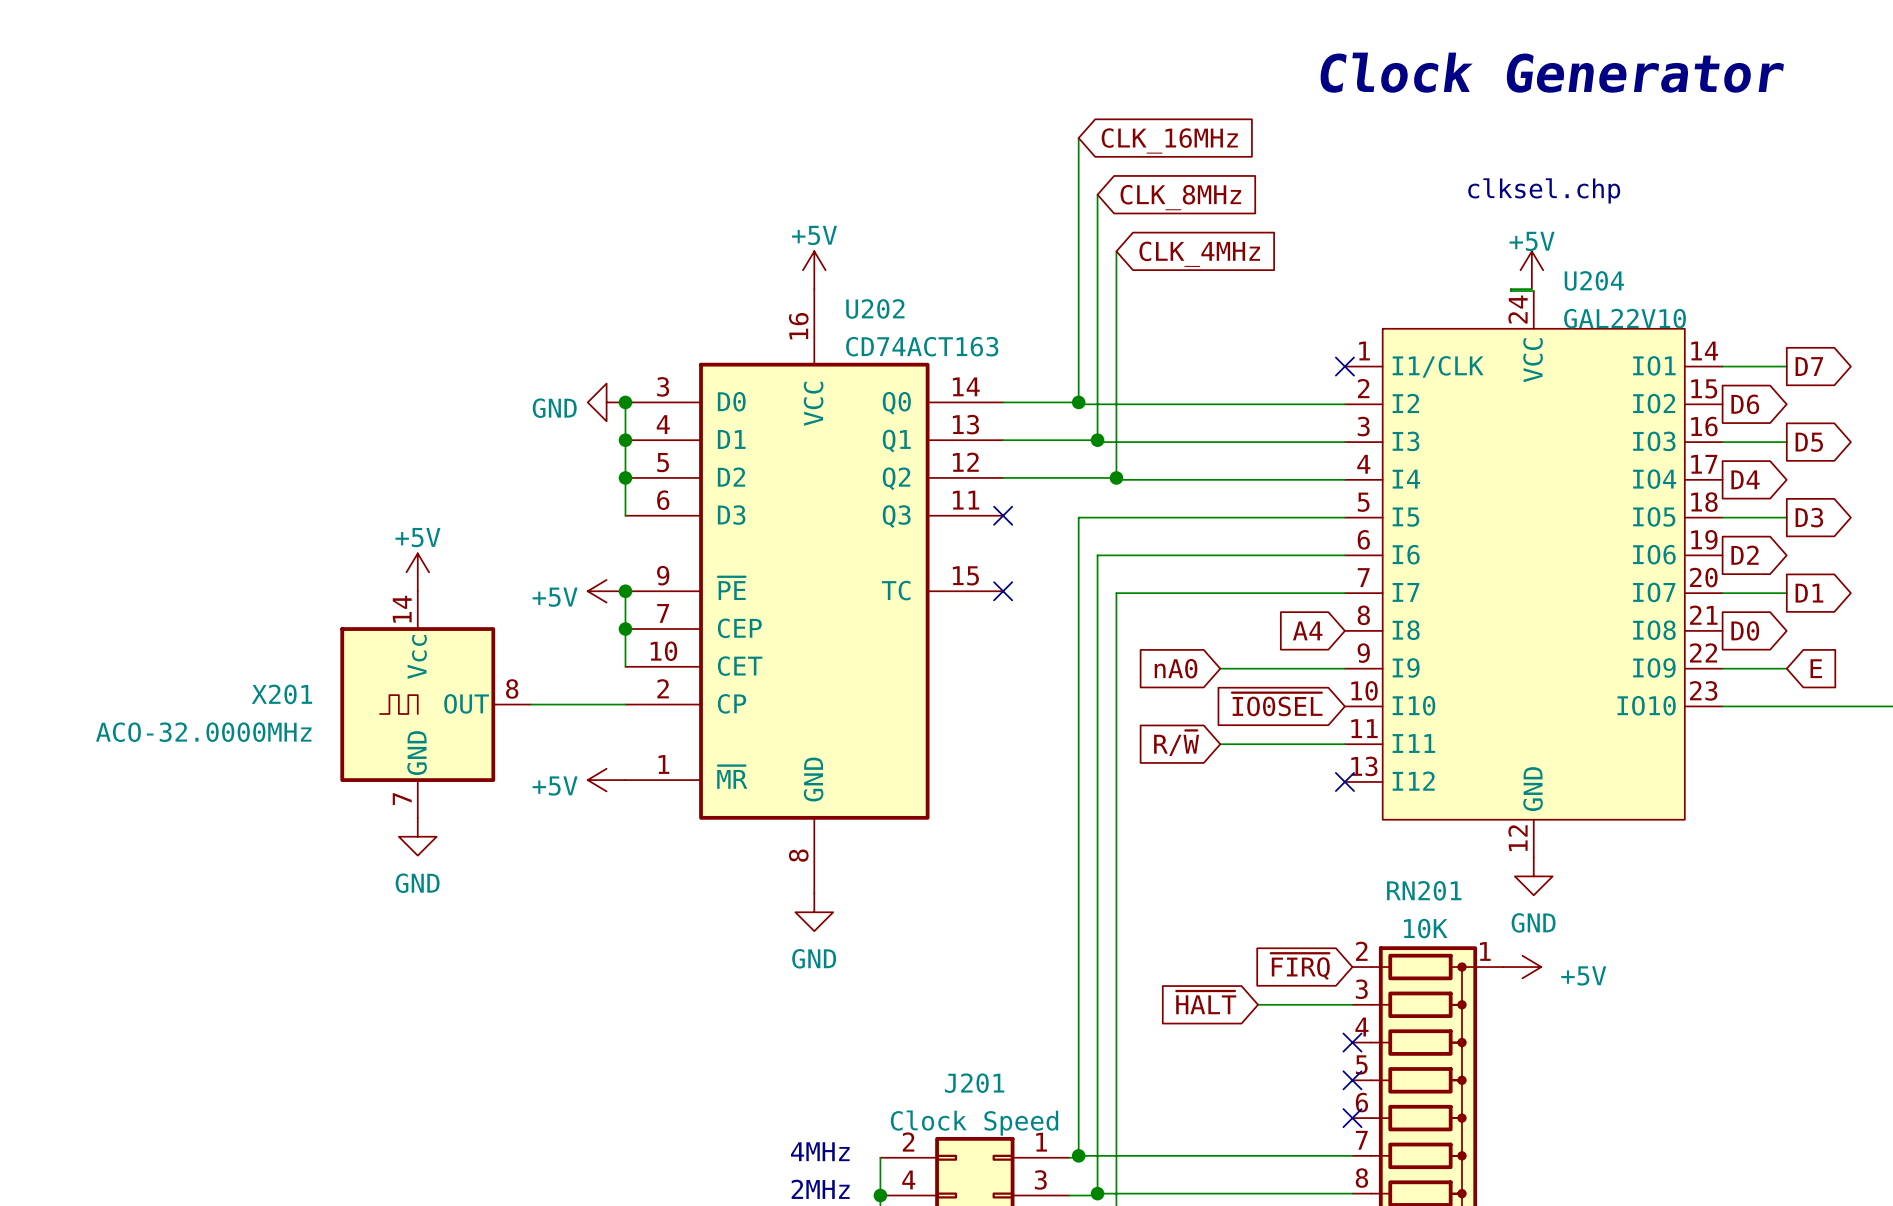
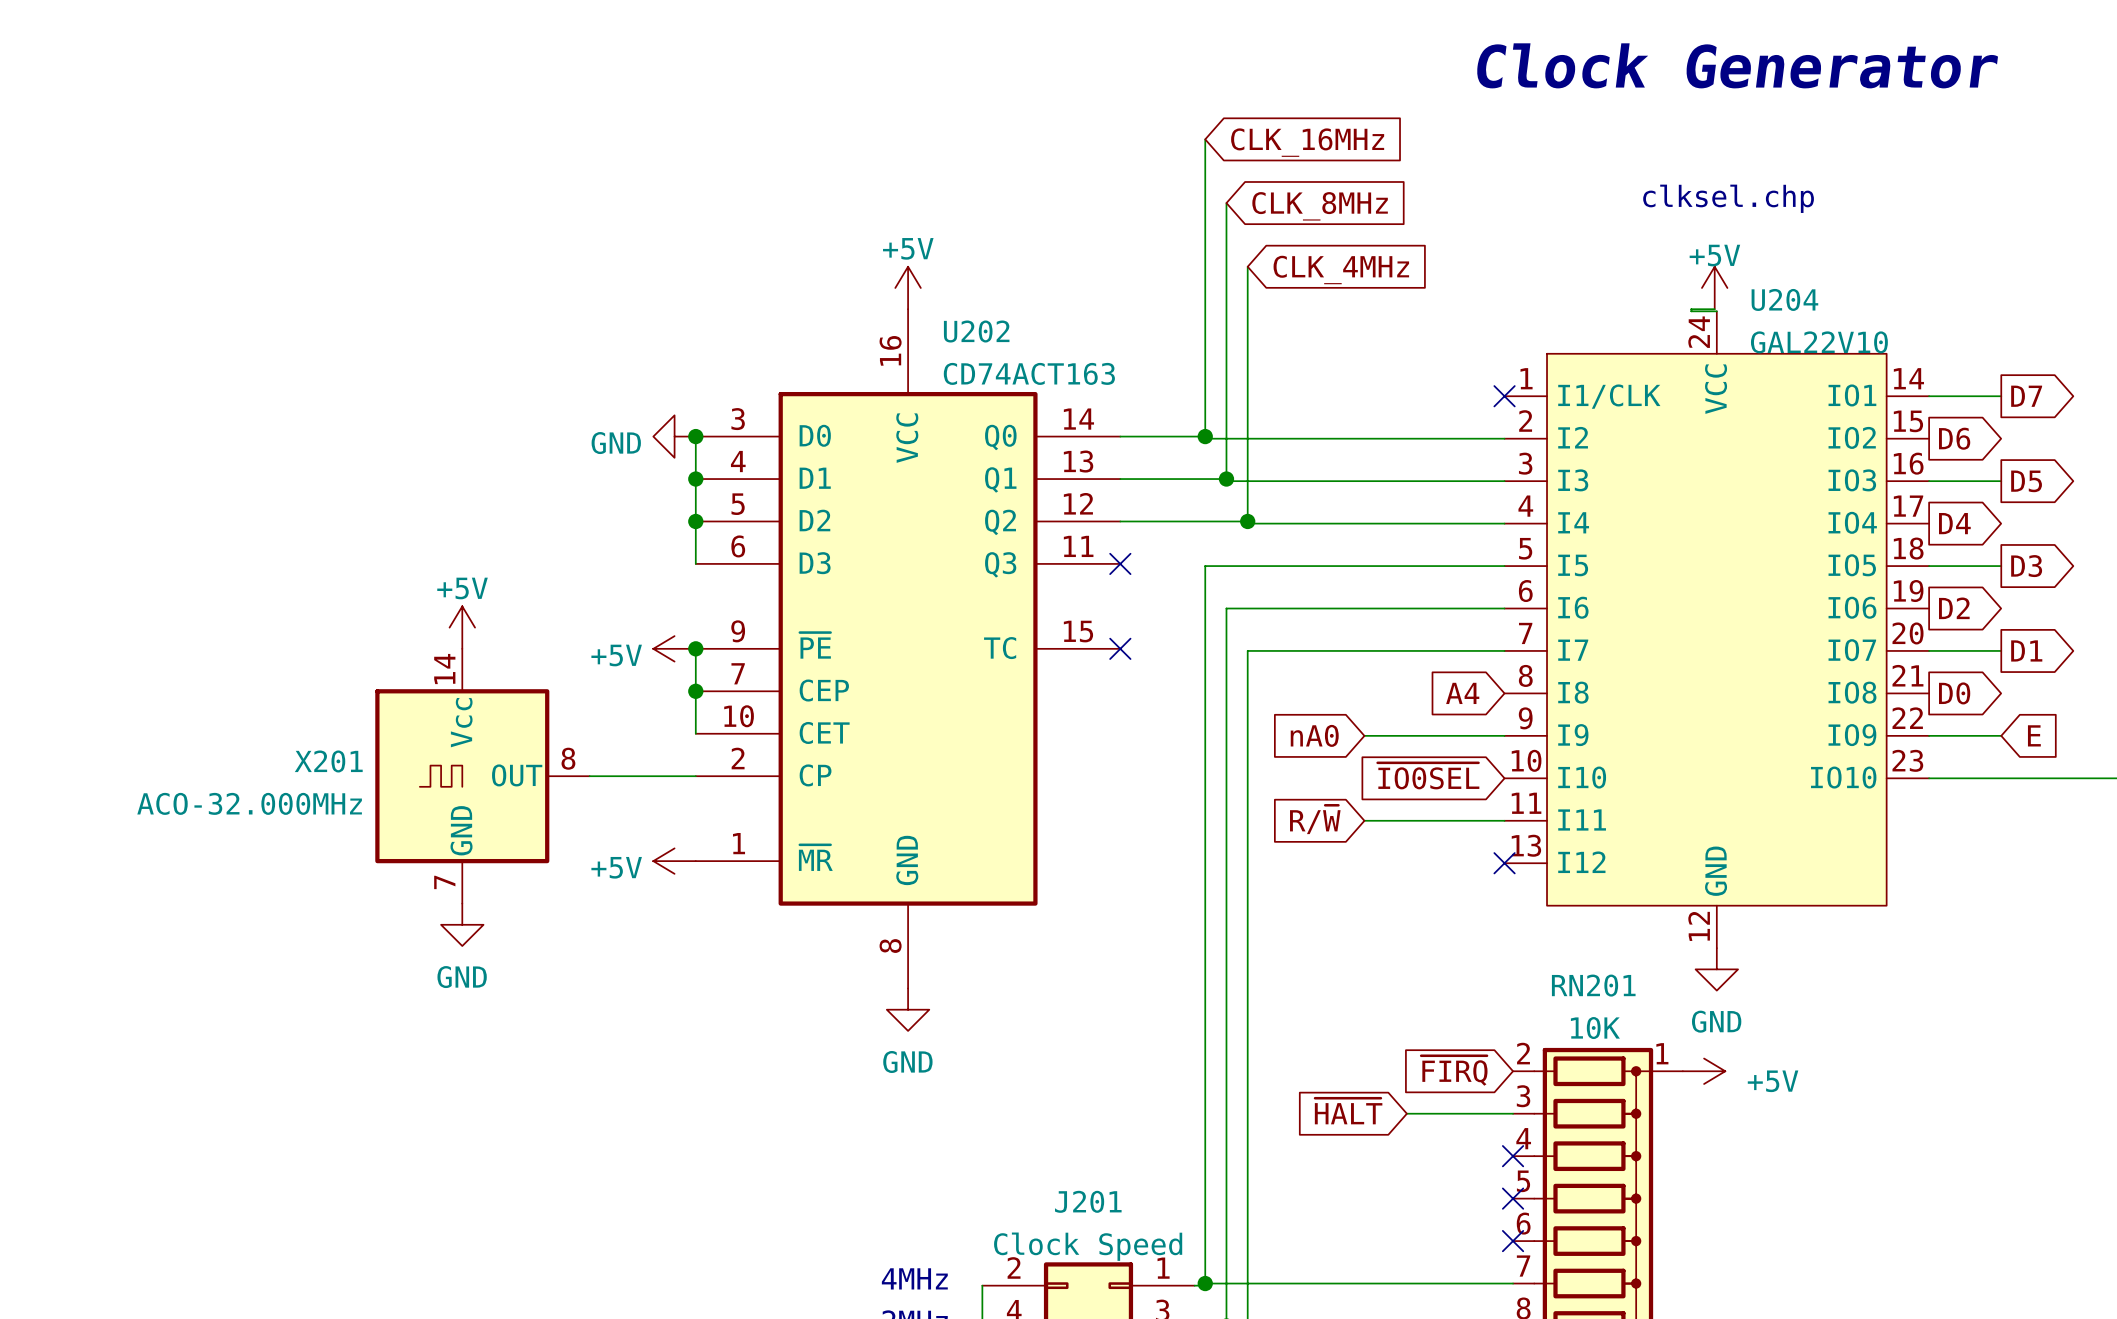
X201 name position: X201 (281, 694) -> X201 (328, 761)
X201 value: ACO-32.0000MHz (203, 732) -> ACO-32.000MHz (249, 803)

